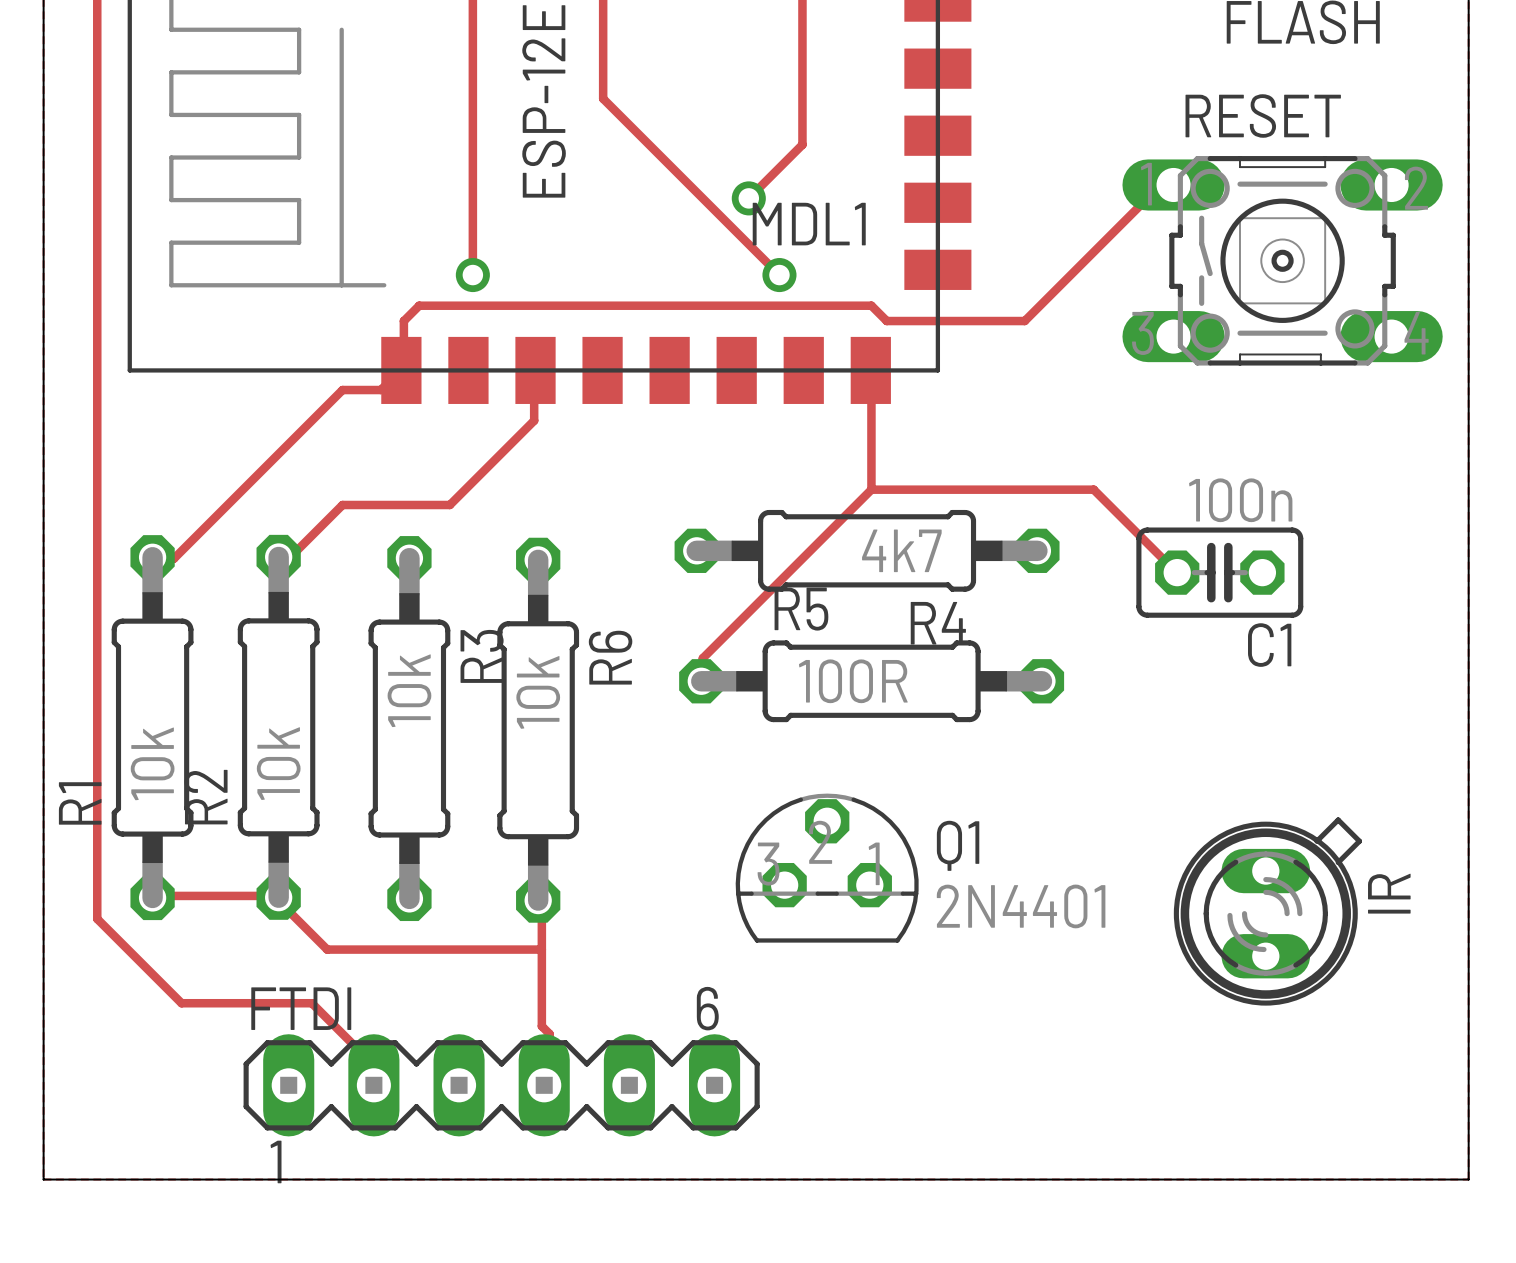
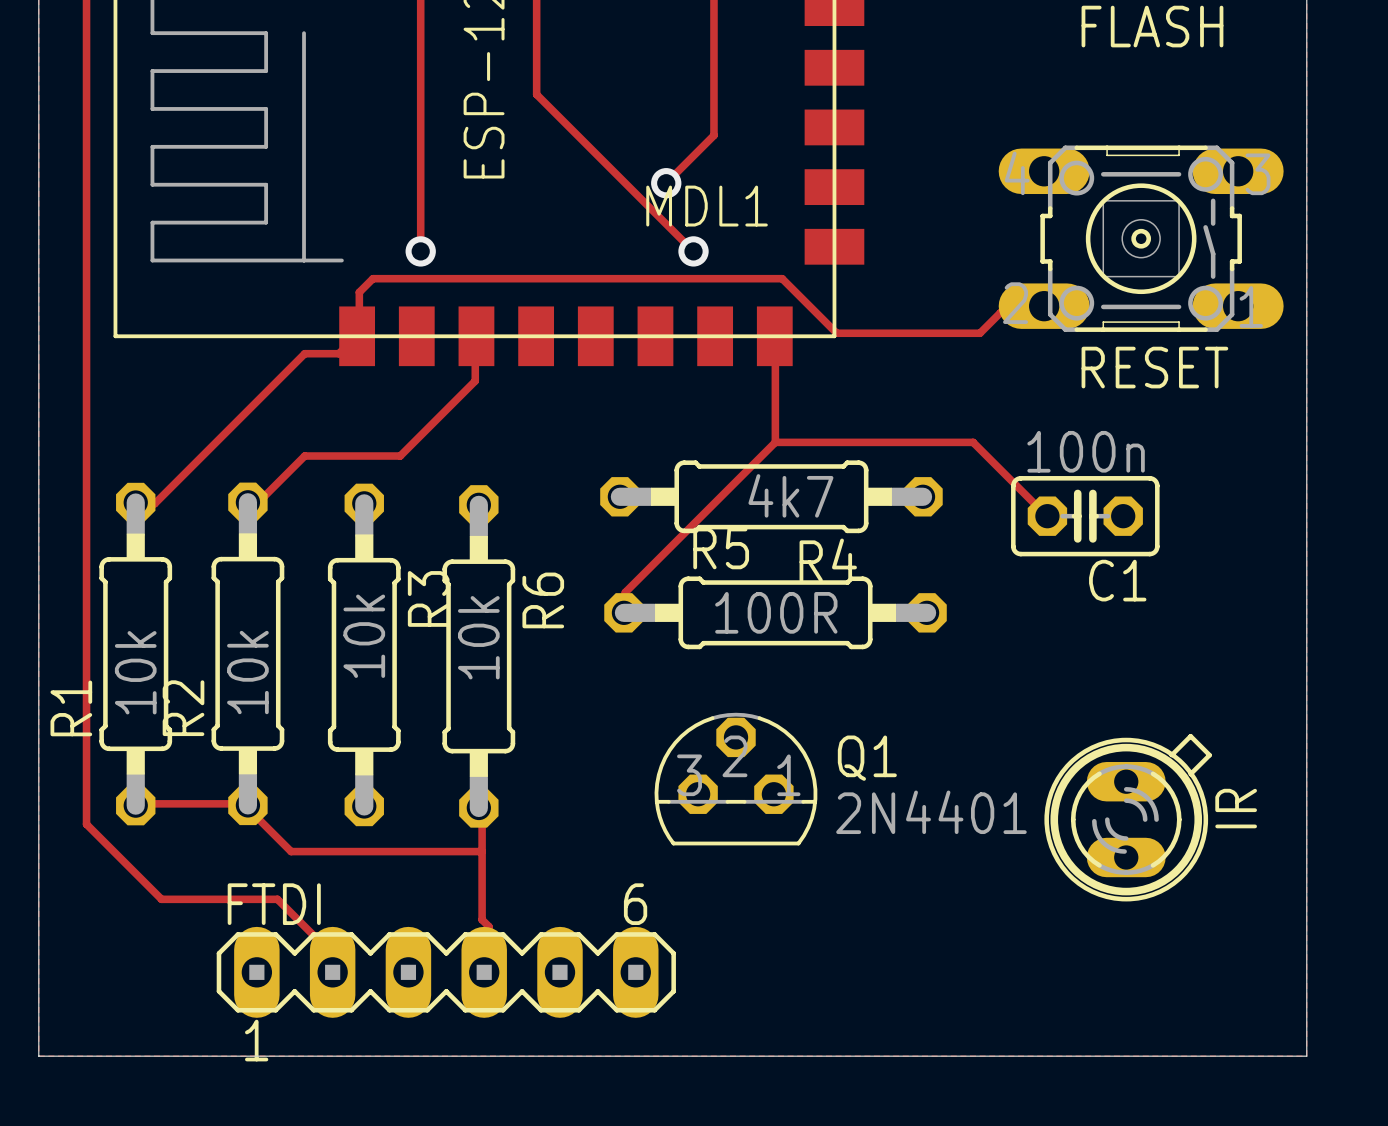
RESET name position: RESET (1263, 116) -> RESET (1154, 367)
RESET footprint: [1122, 156, 1443, 366] -> [998, 145, 1284, 332]
track: (1173, 184) (1170, 190) (1155, 190) (1024, 321) (886, 321) (871, 305) -> (1044, 306) (1041, 312) (1000, 312) (979, 333) (836, 333) (782, 278) (775, 278)

